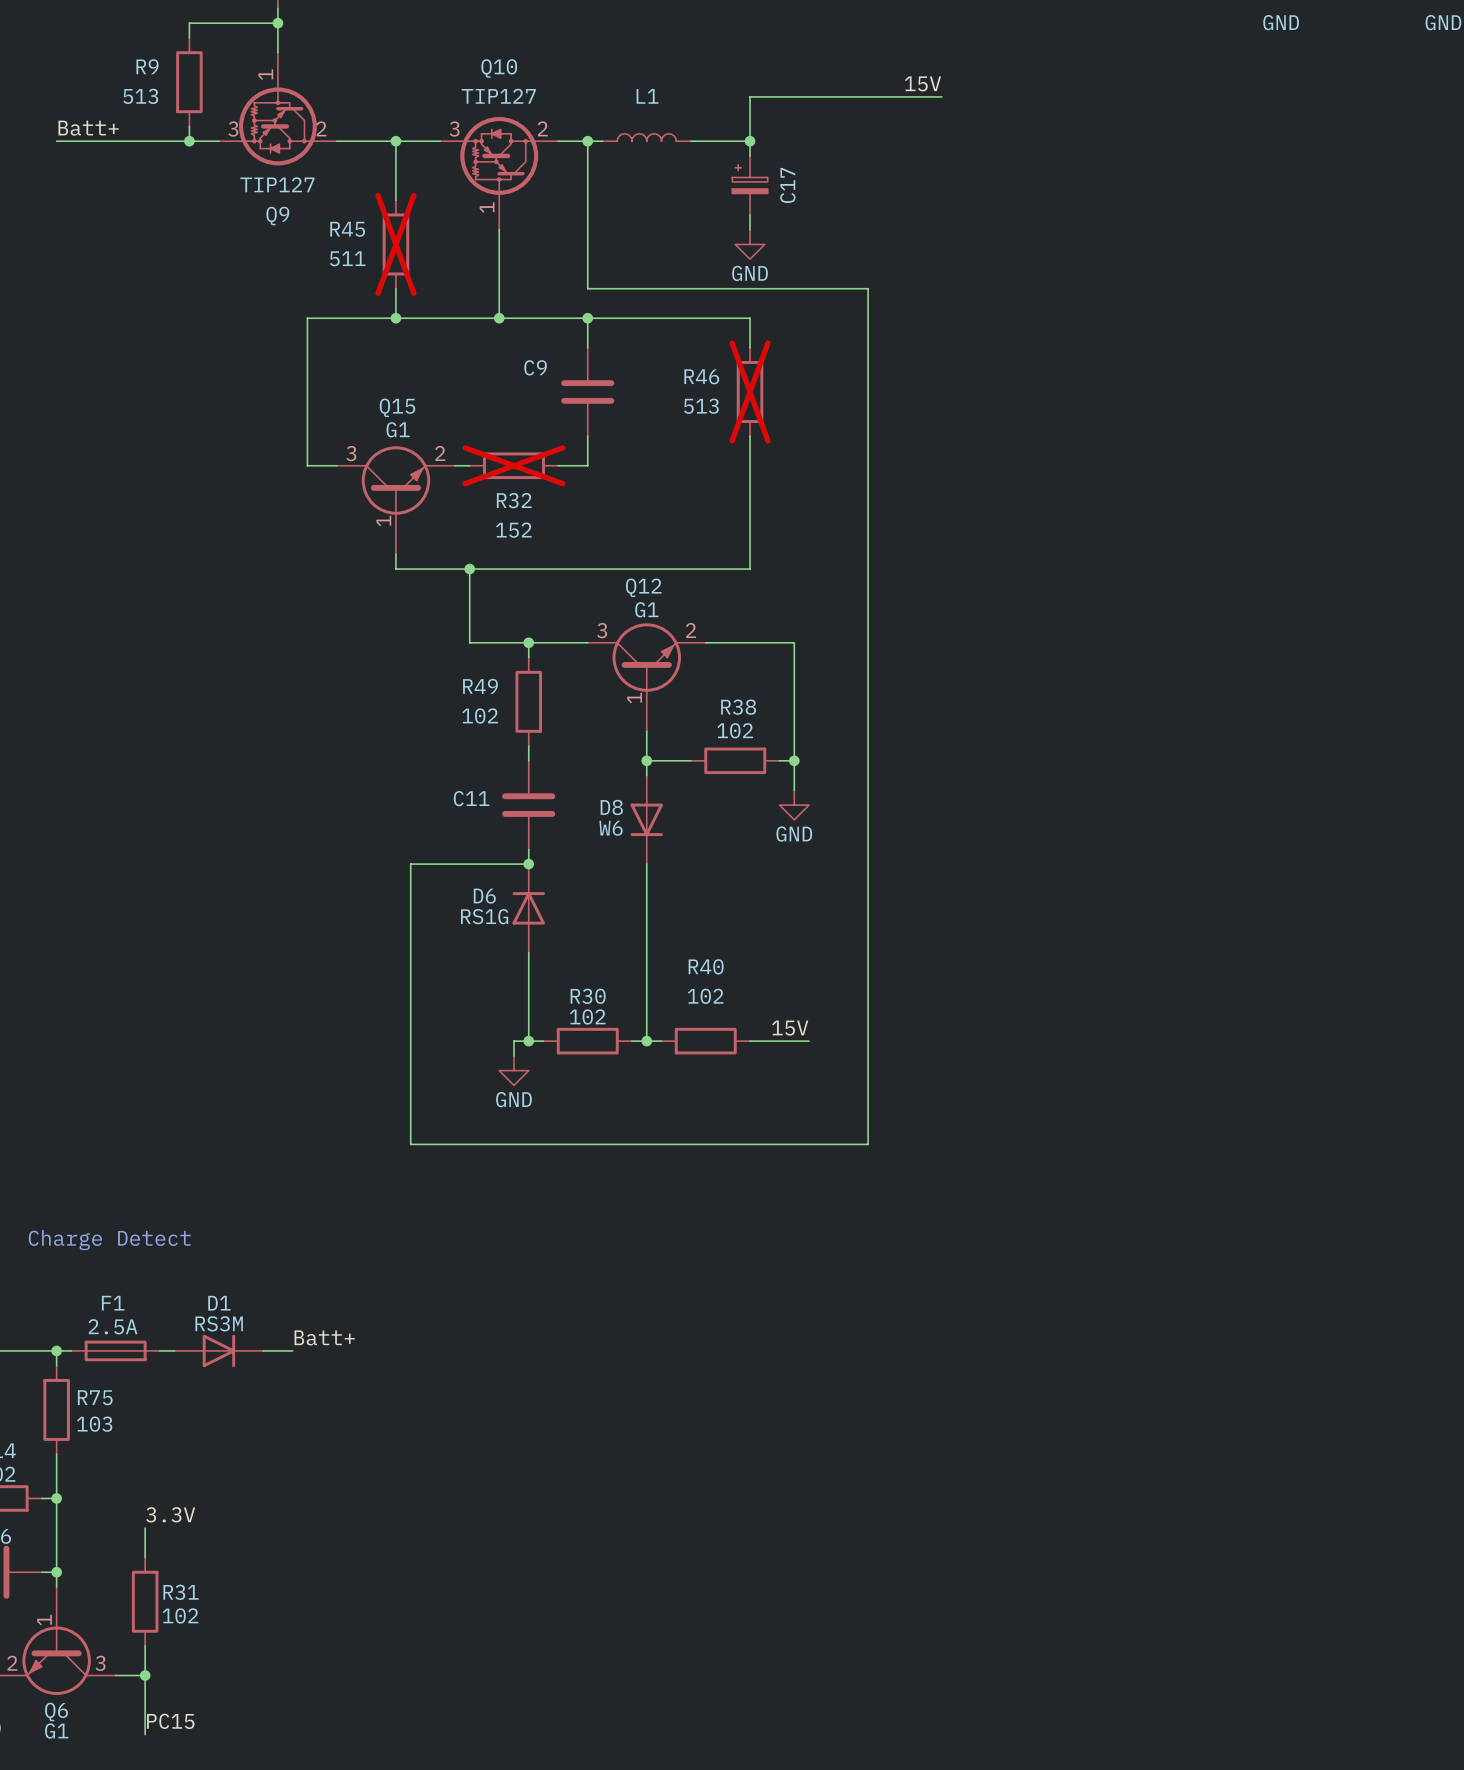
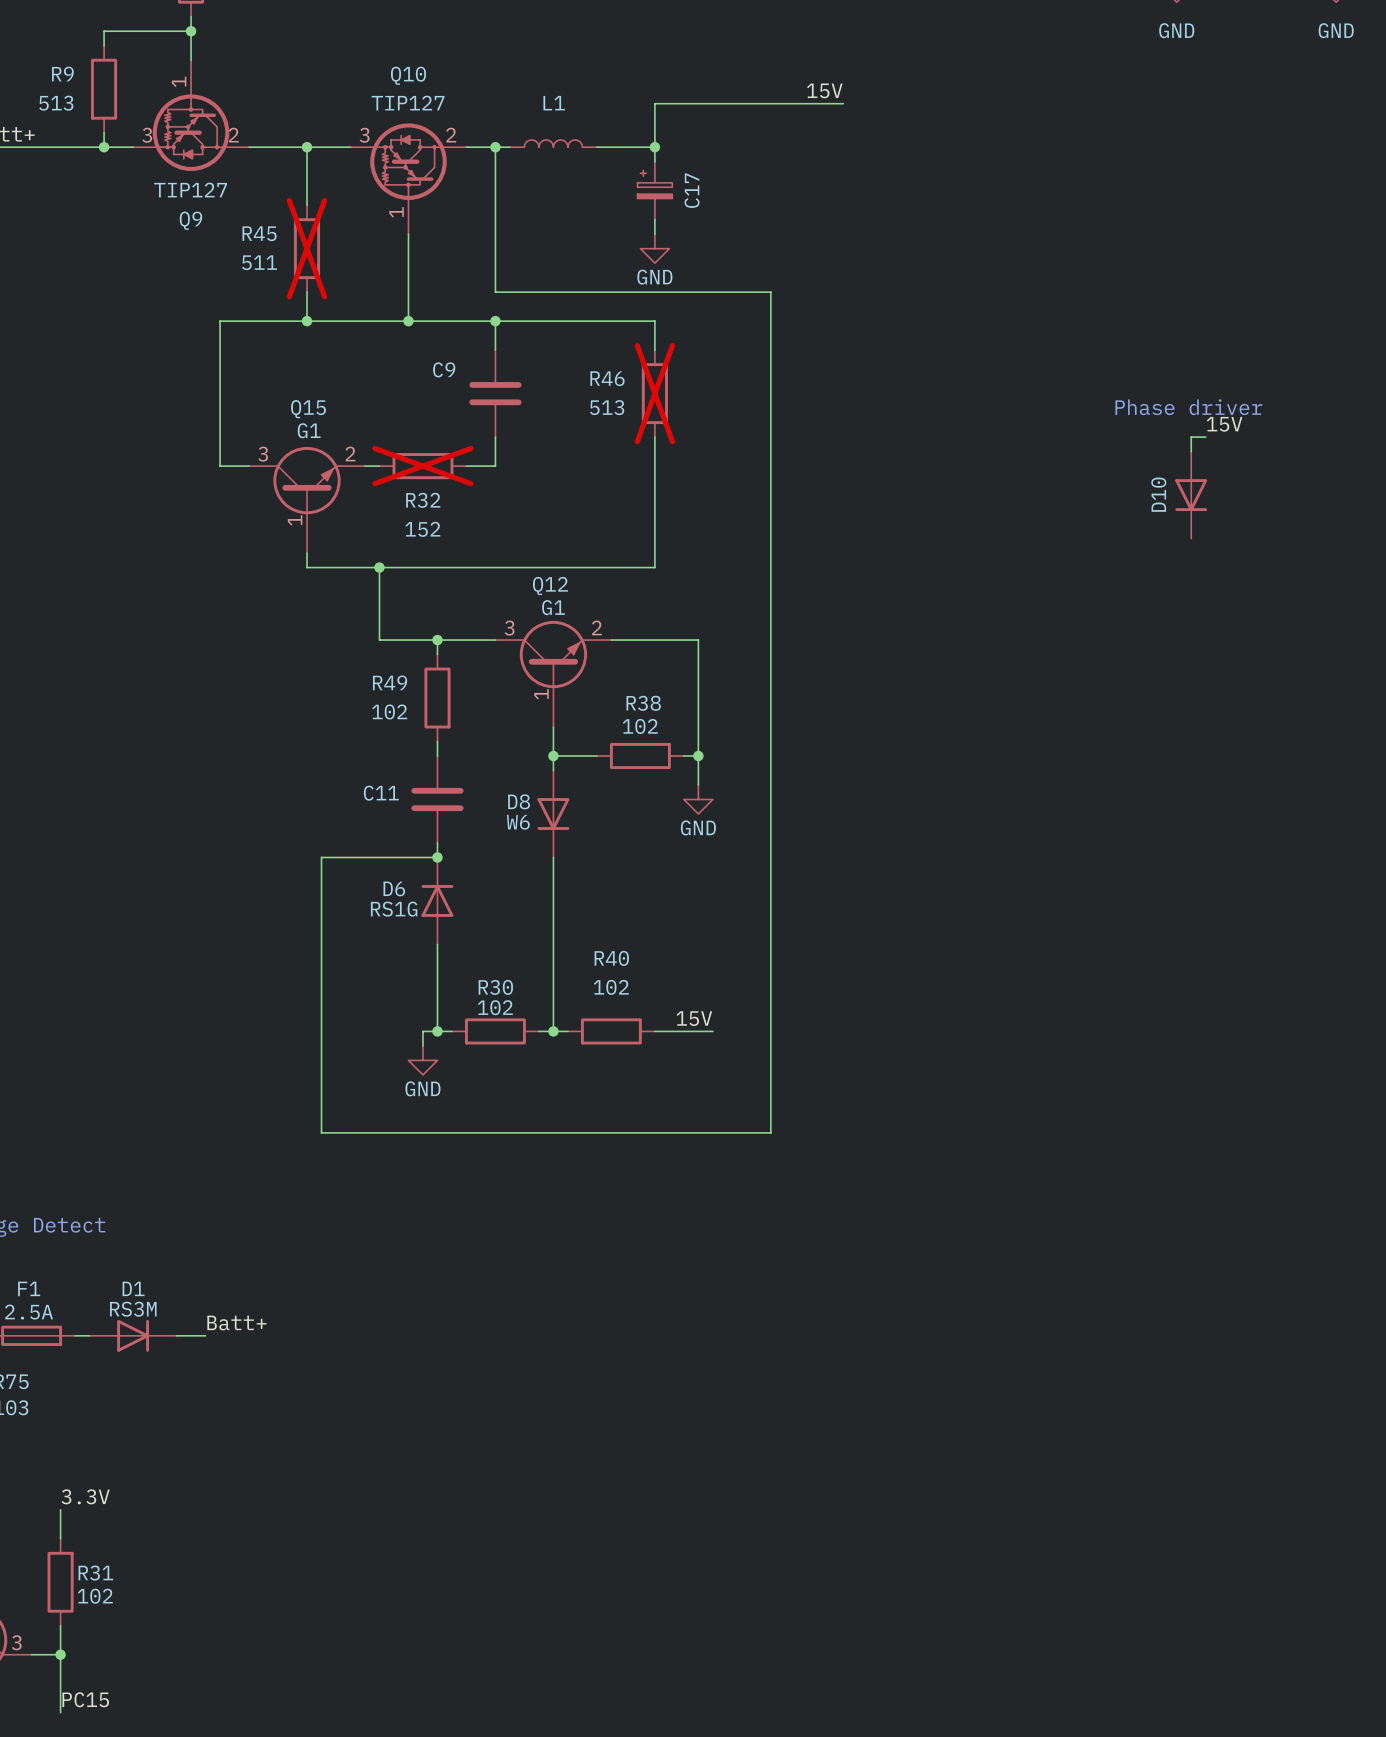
text: none -> Phase driver (1188, 407)
label: none -> 15V (1224, 424)
wire: none -> (1205, 437) (1191, 437) (1191, 451)
D10: none -> (1191, 495)

